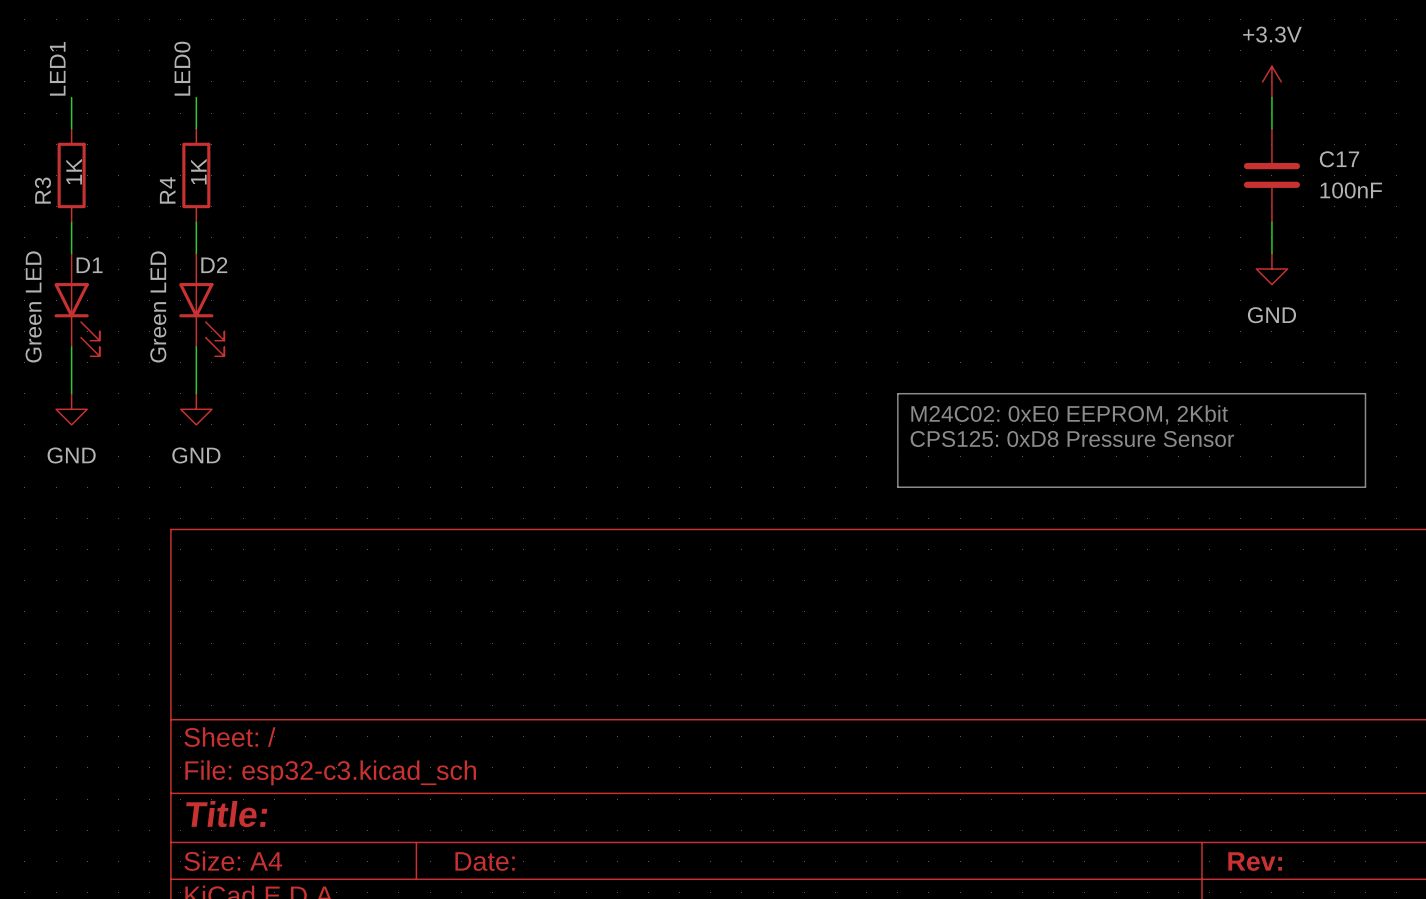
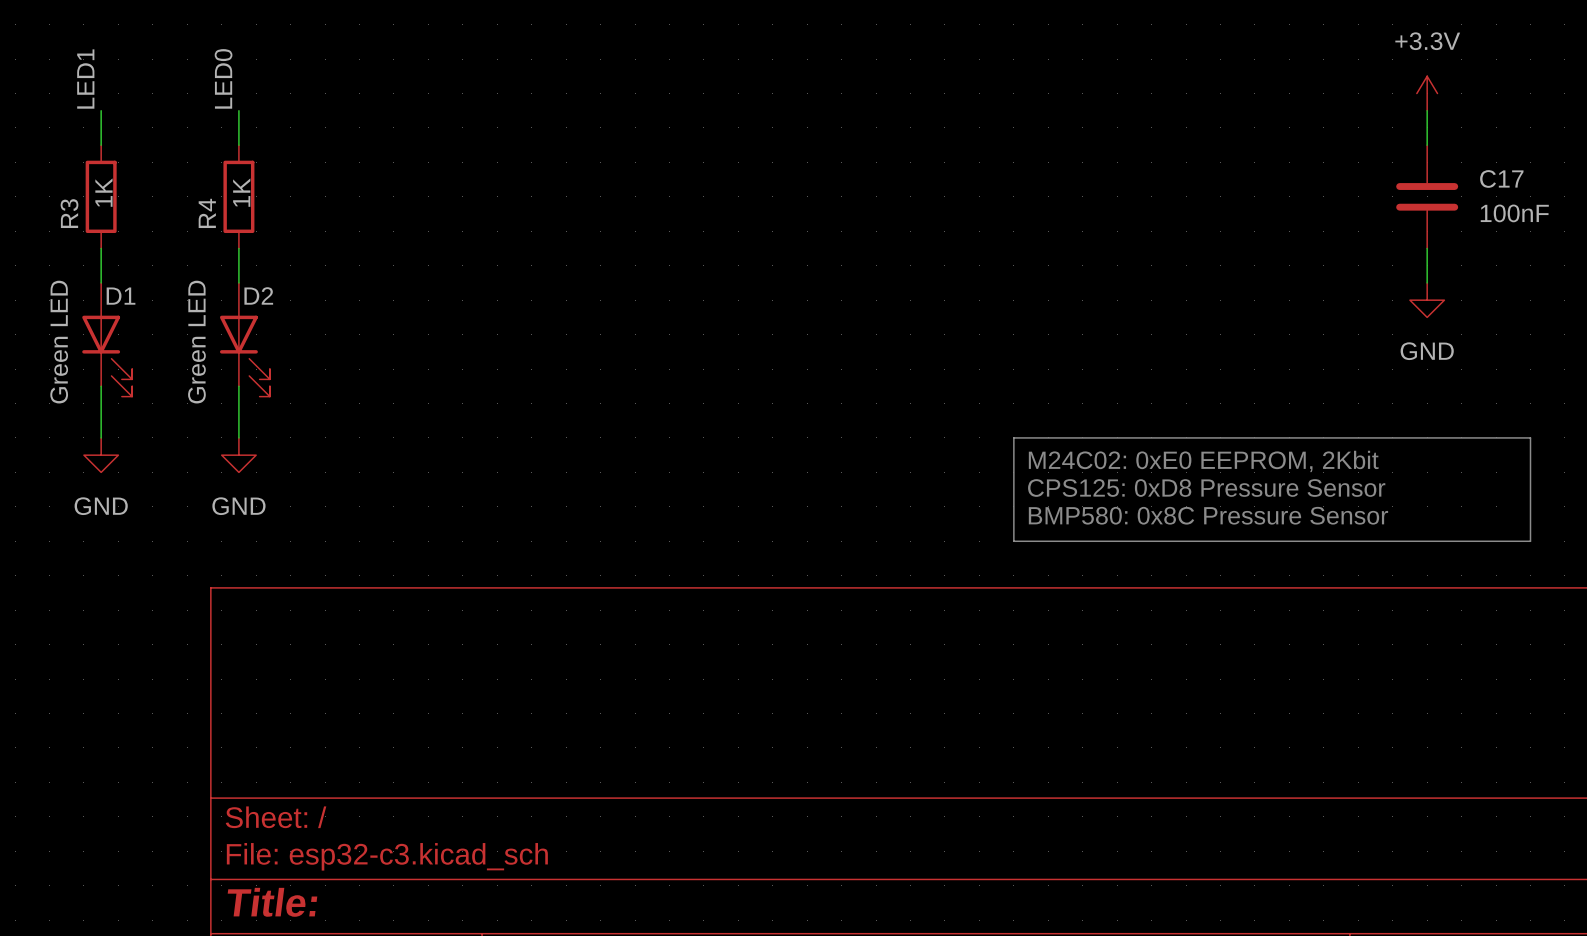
text: none -> BMP580: 0x8C Pressure Sensor (1208, 515)

